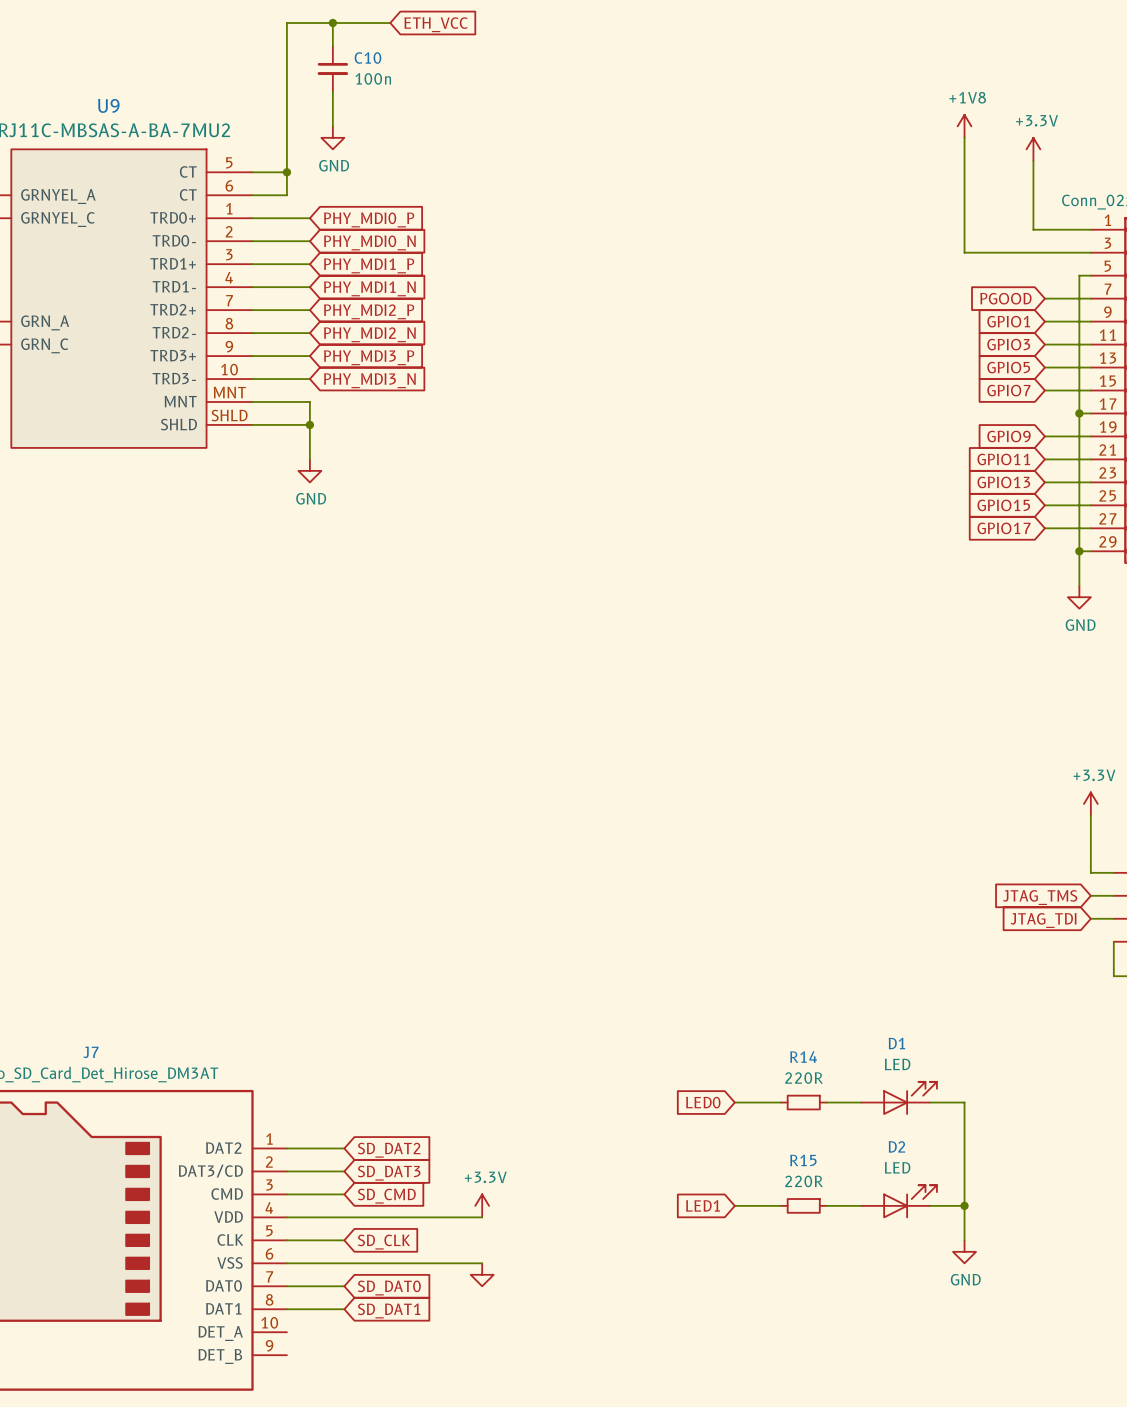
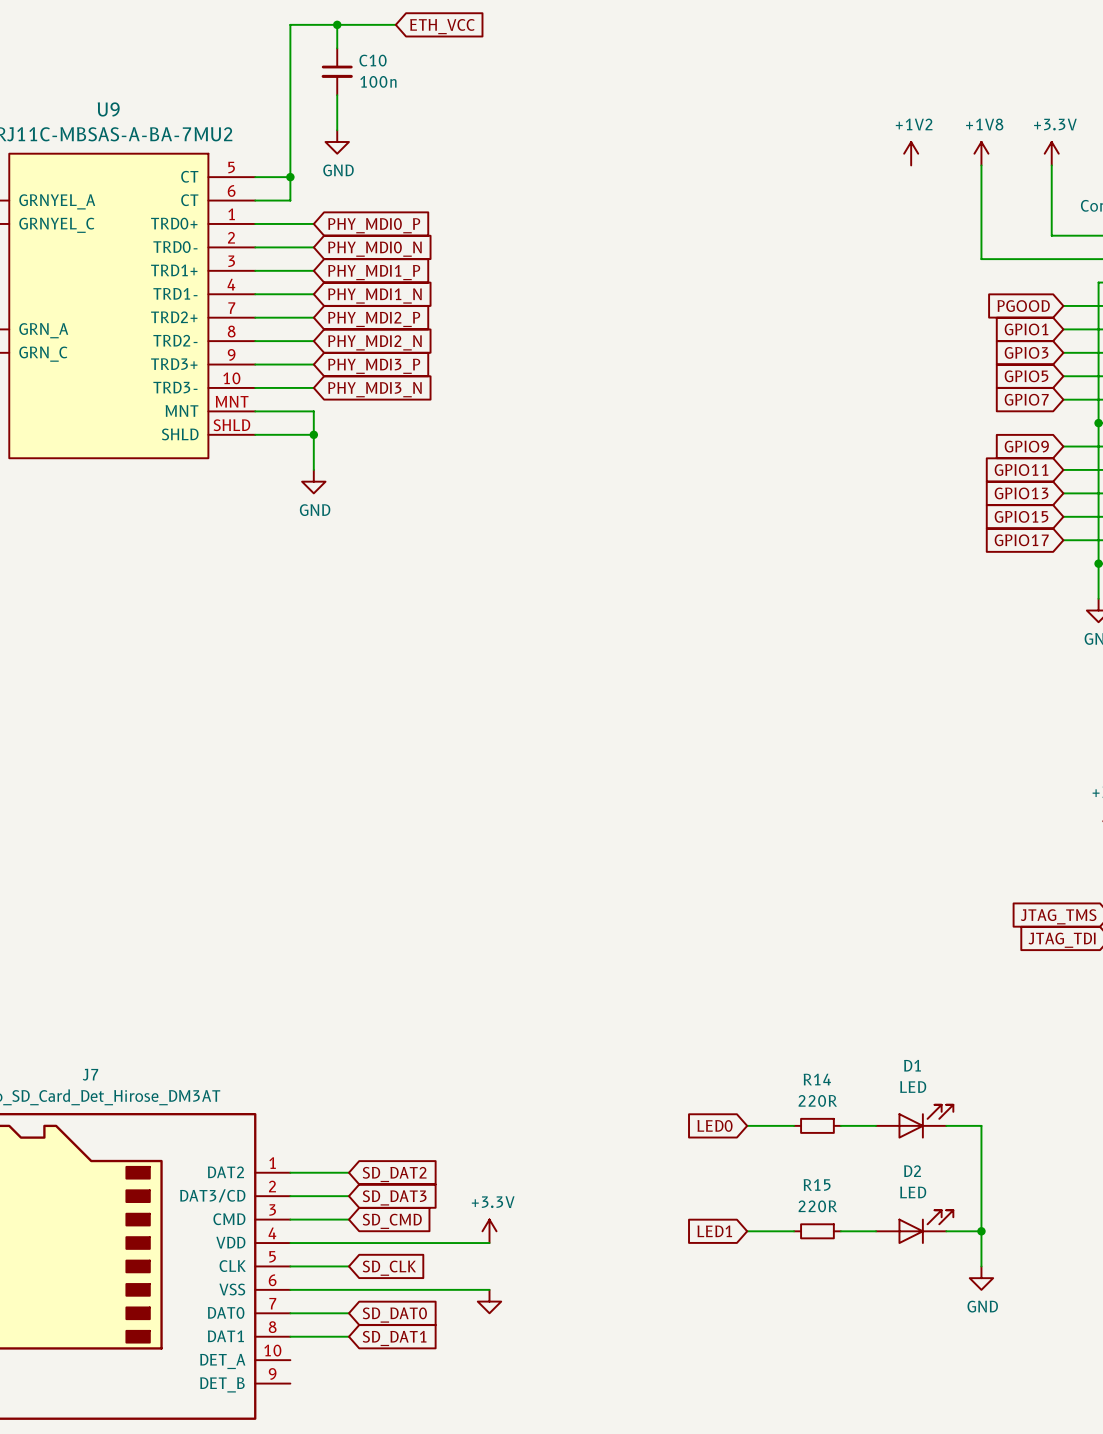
power symbol position: +1V8 (964, 126) -> +1V8 (981, 153)
power symbol: none -> +1V2 (911, 153)

